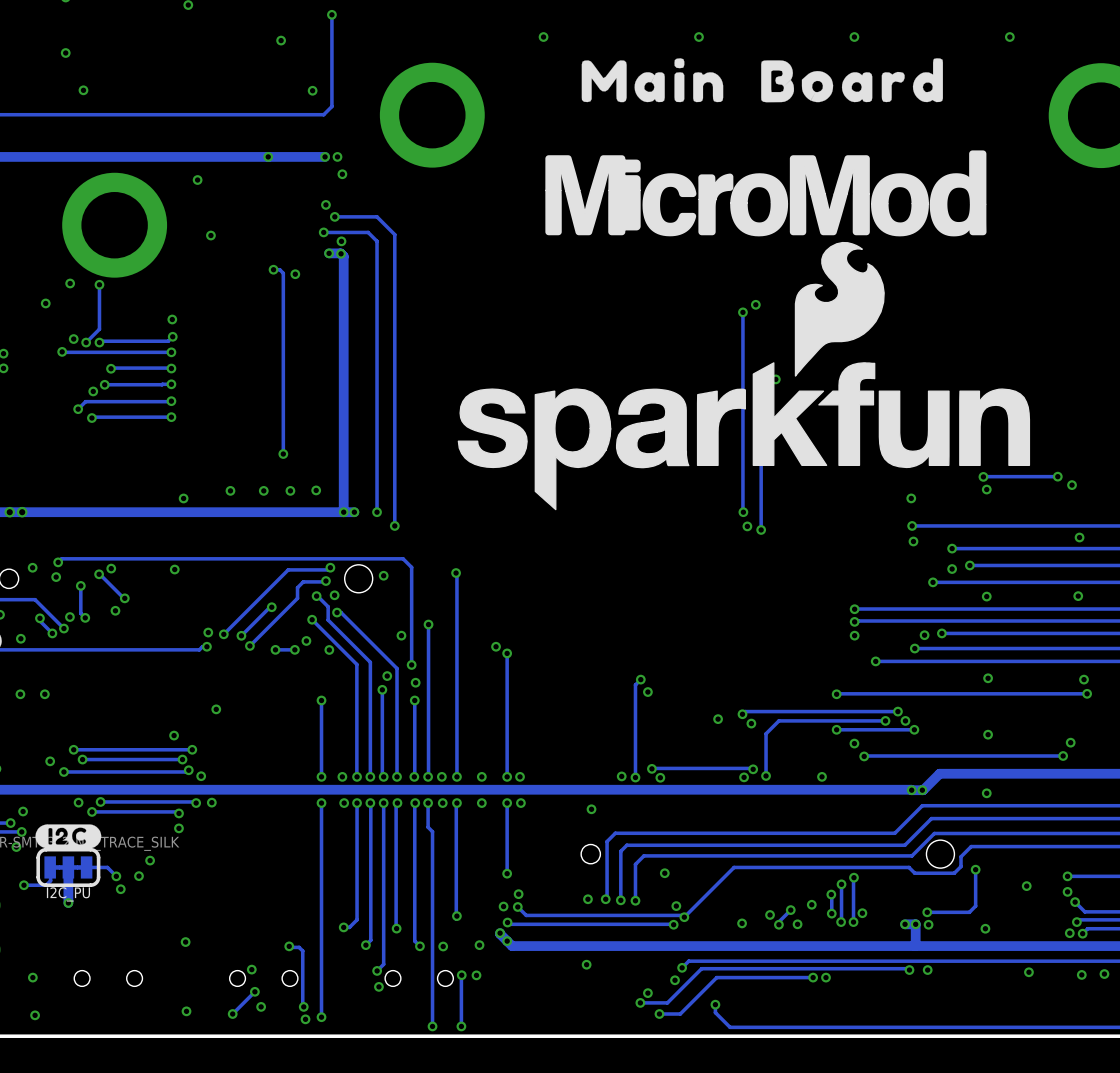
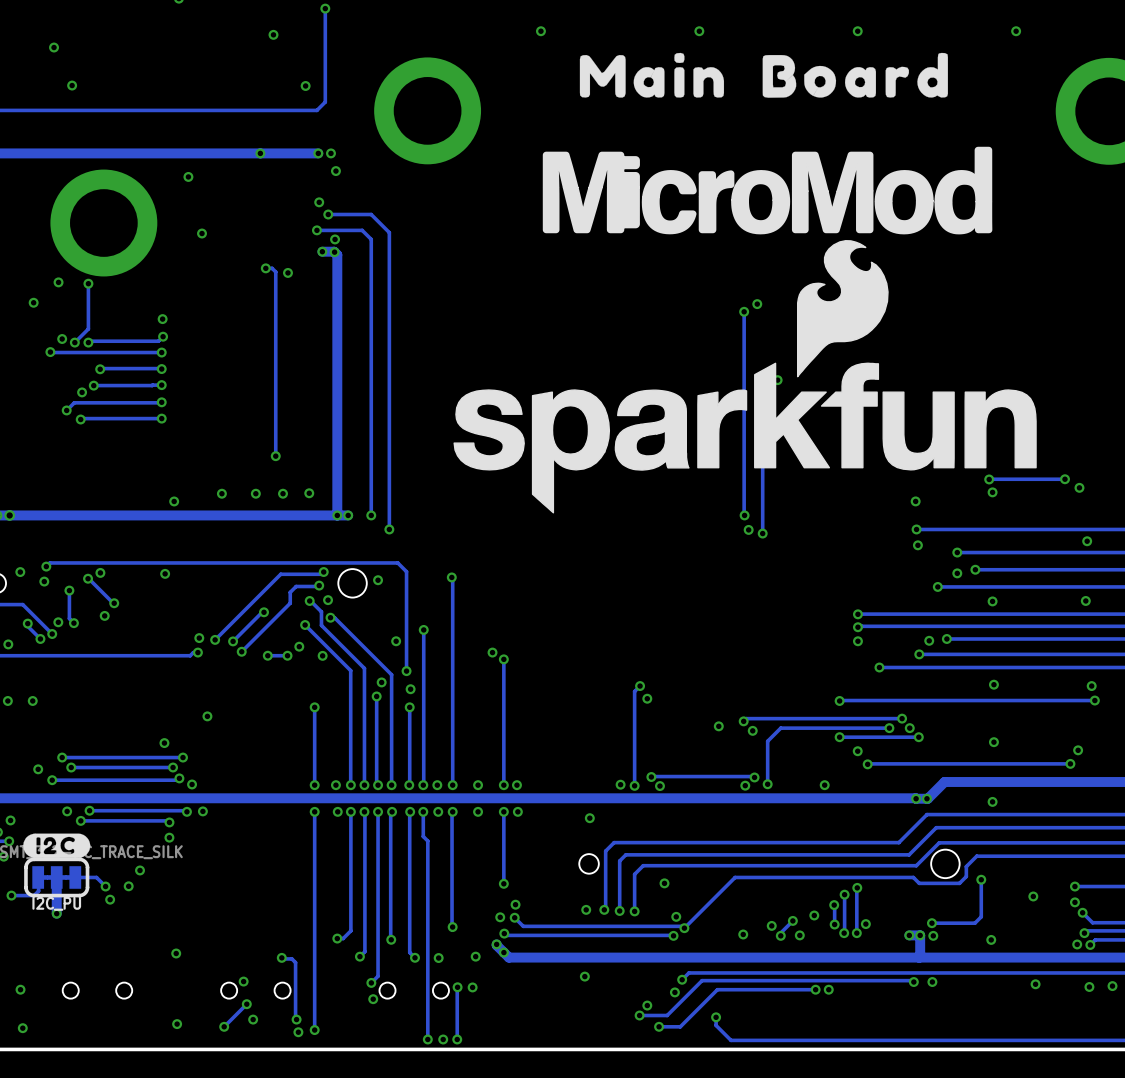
via: none -> (443, 1039)

